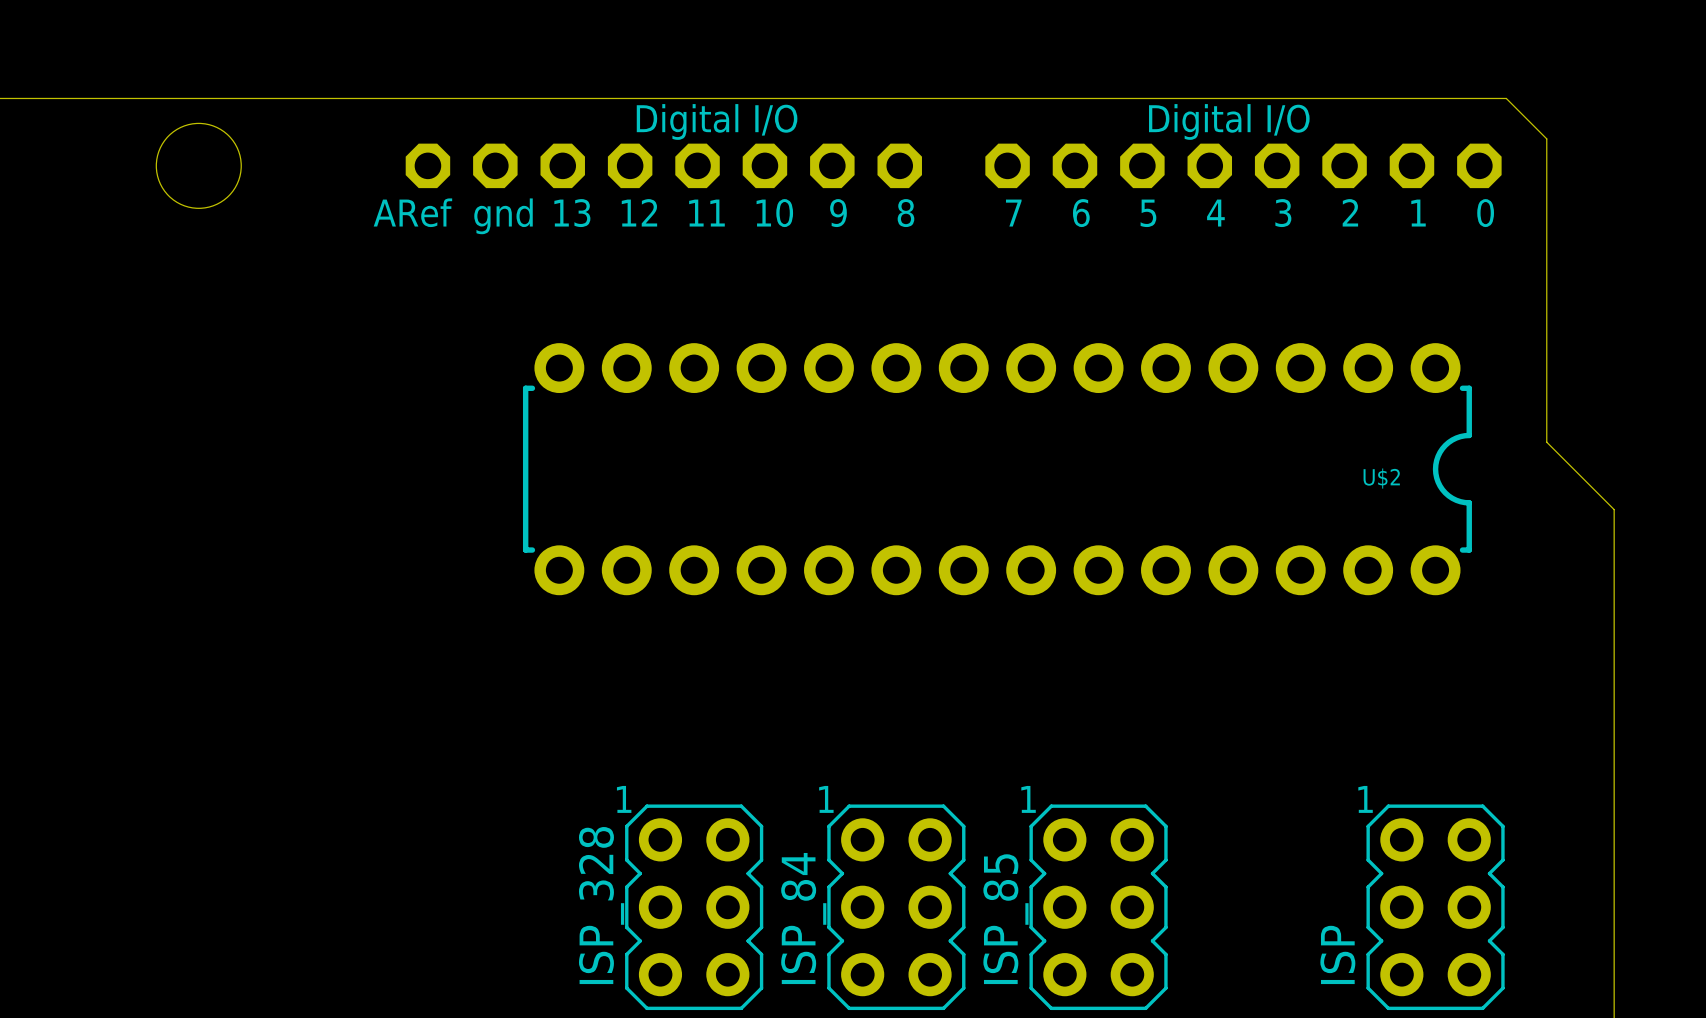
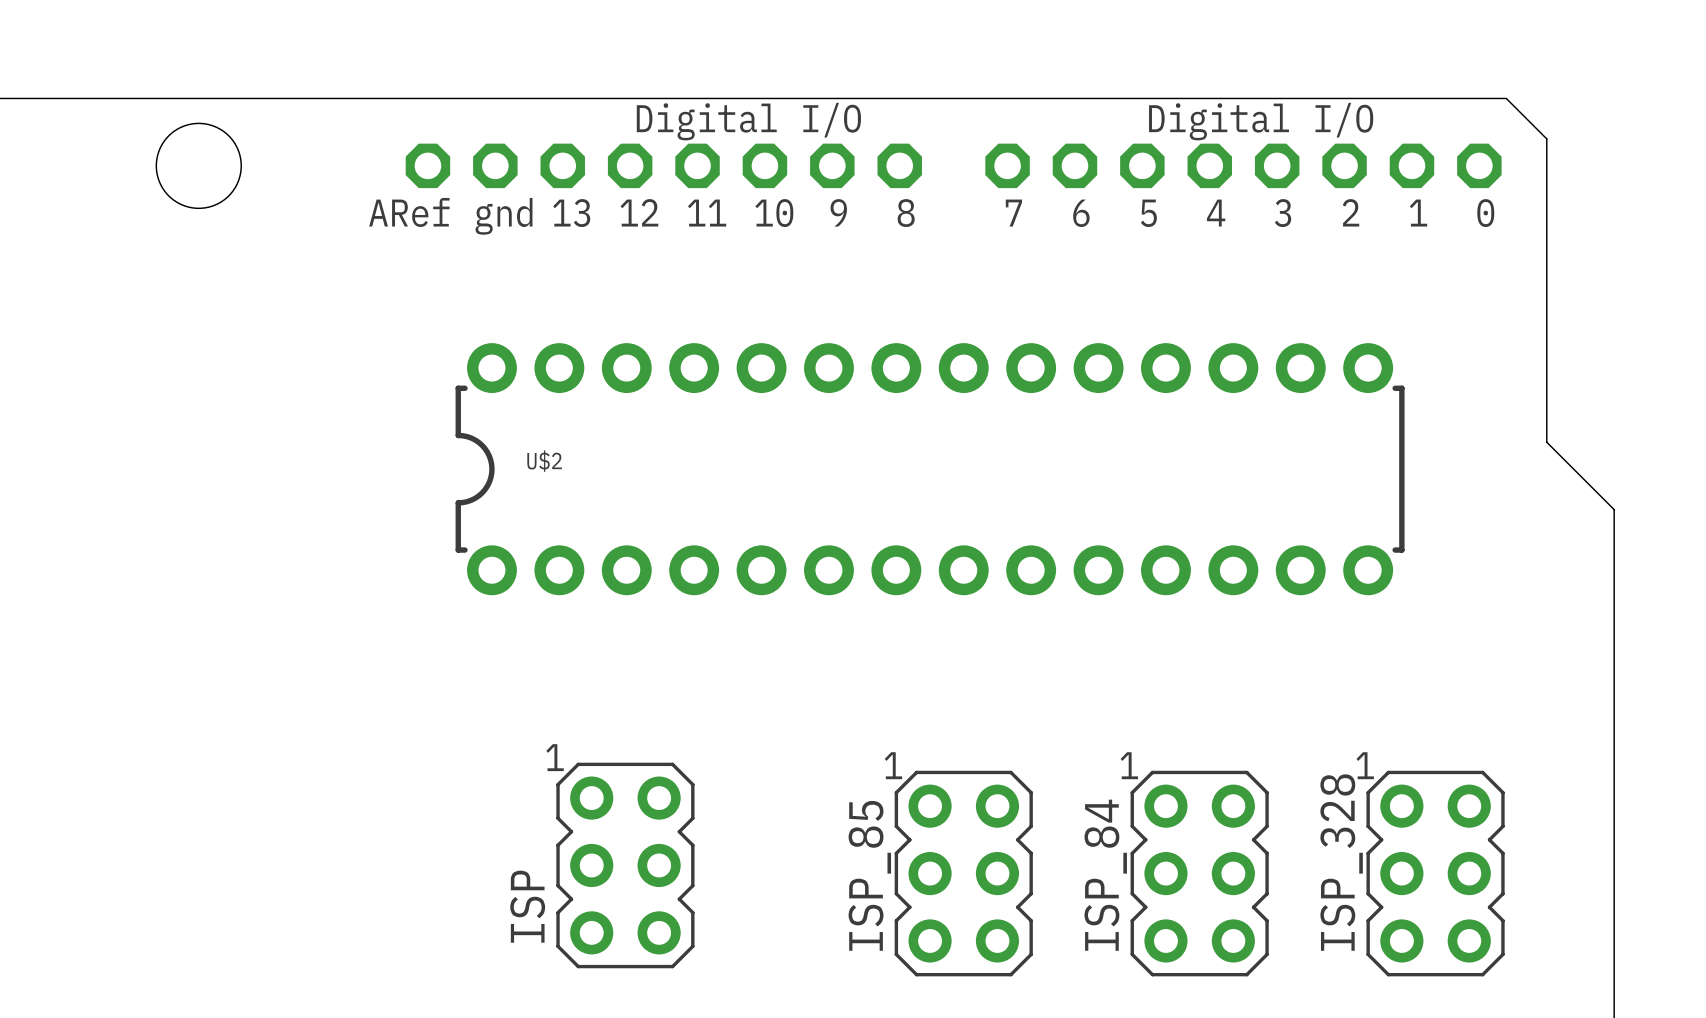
U$2 rotation: 0° (997, 469) -> 180° (930, 469)
ISP: none -> (625, 865)
ISP_328 position: (694, 907) -> (1435, 873)
ISP_84 position: (896, 907) -> (1199, 873)
ISP_85 position: (1098, 907) -> (963, 873)
ISP: (1435, 907) -> none

